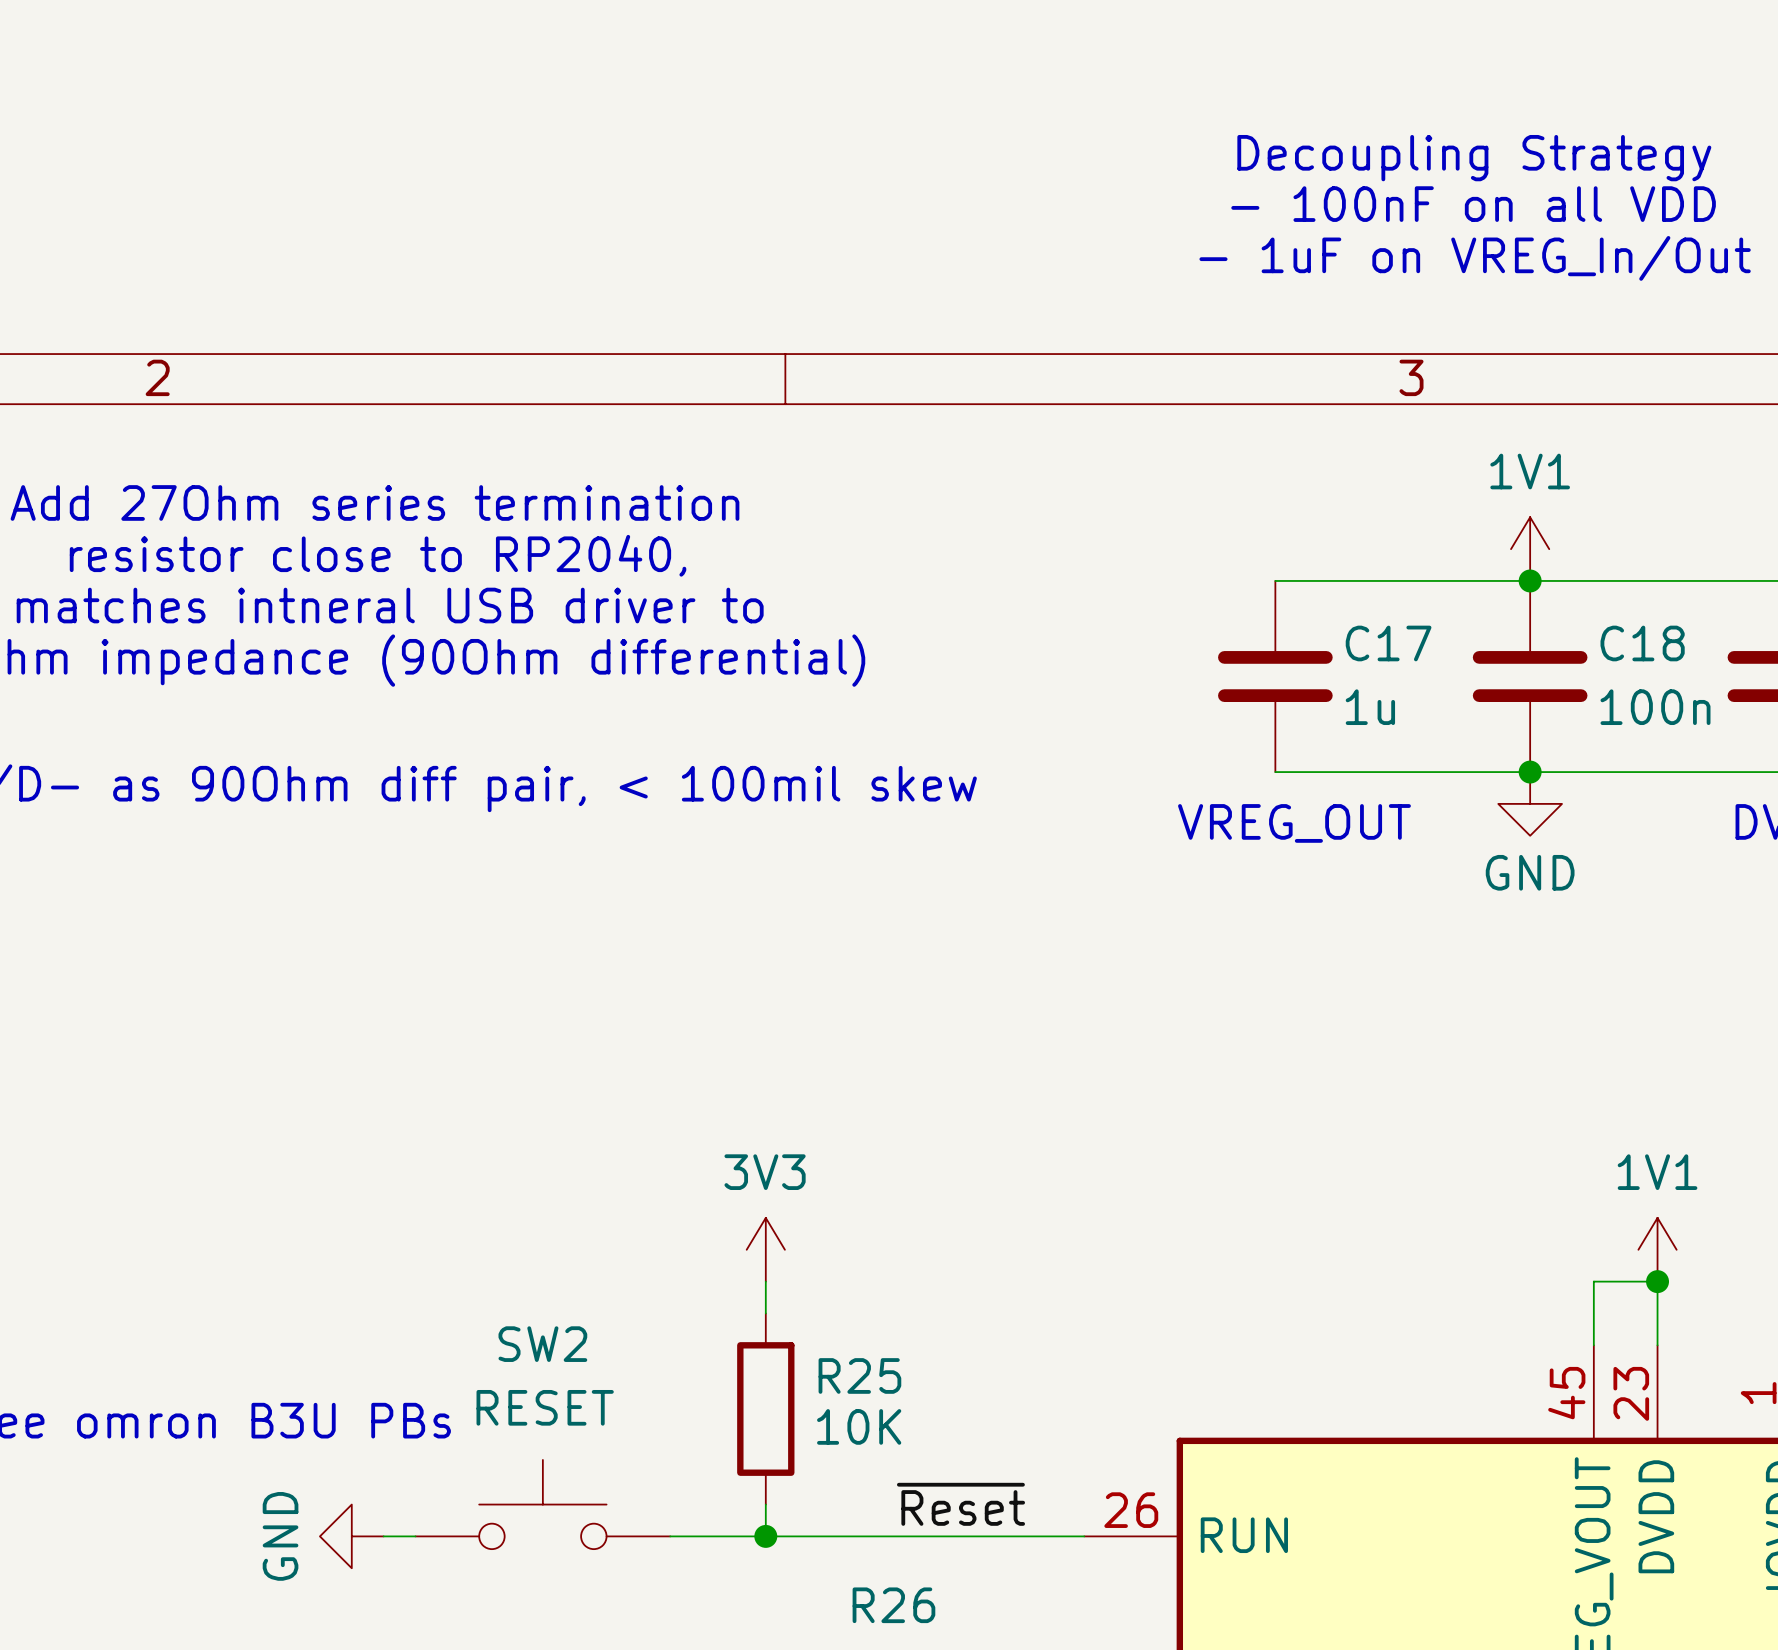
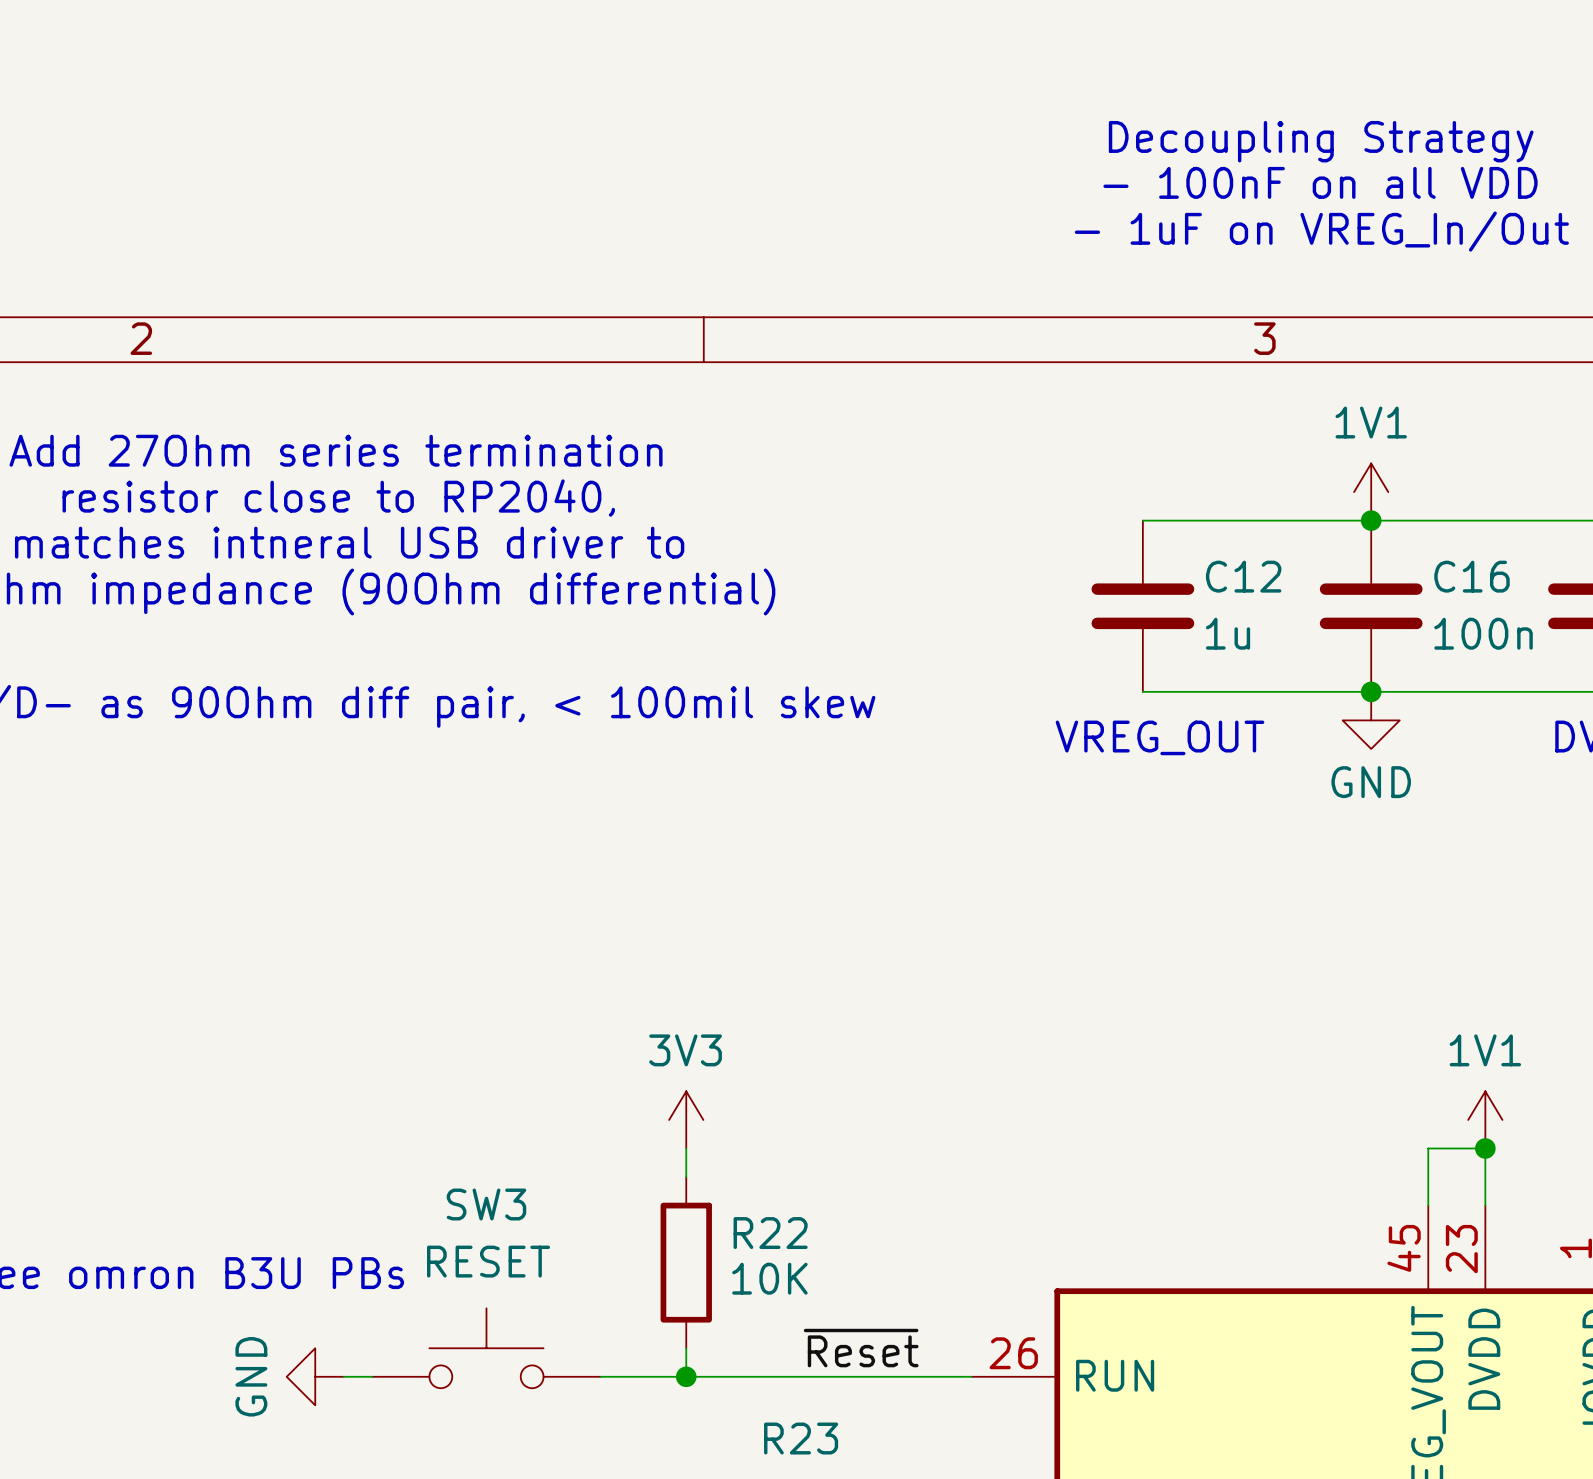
C17 name: C17 (1388, 643) -> C12 (1243, 576)
C18 name: C18 (1642, 643) -> C16 (1471, 576)
SW2 name: SW2 (542, 1344) -> SW3 (486, 1204)
R25 name: R25 (859, 1375) -> R22 (770, 1233)
R26 name: R26 (893, 1605) -> R23 (801, 1438)

